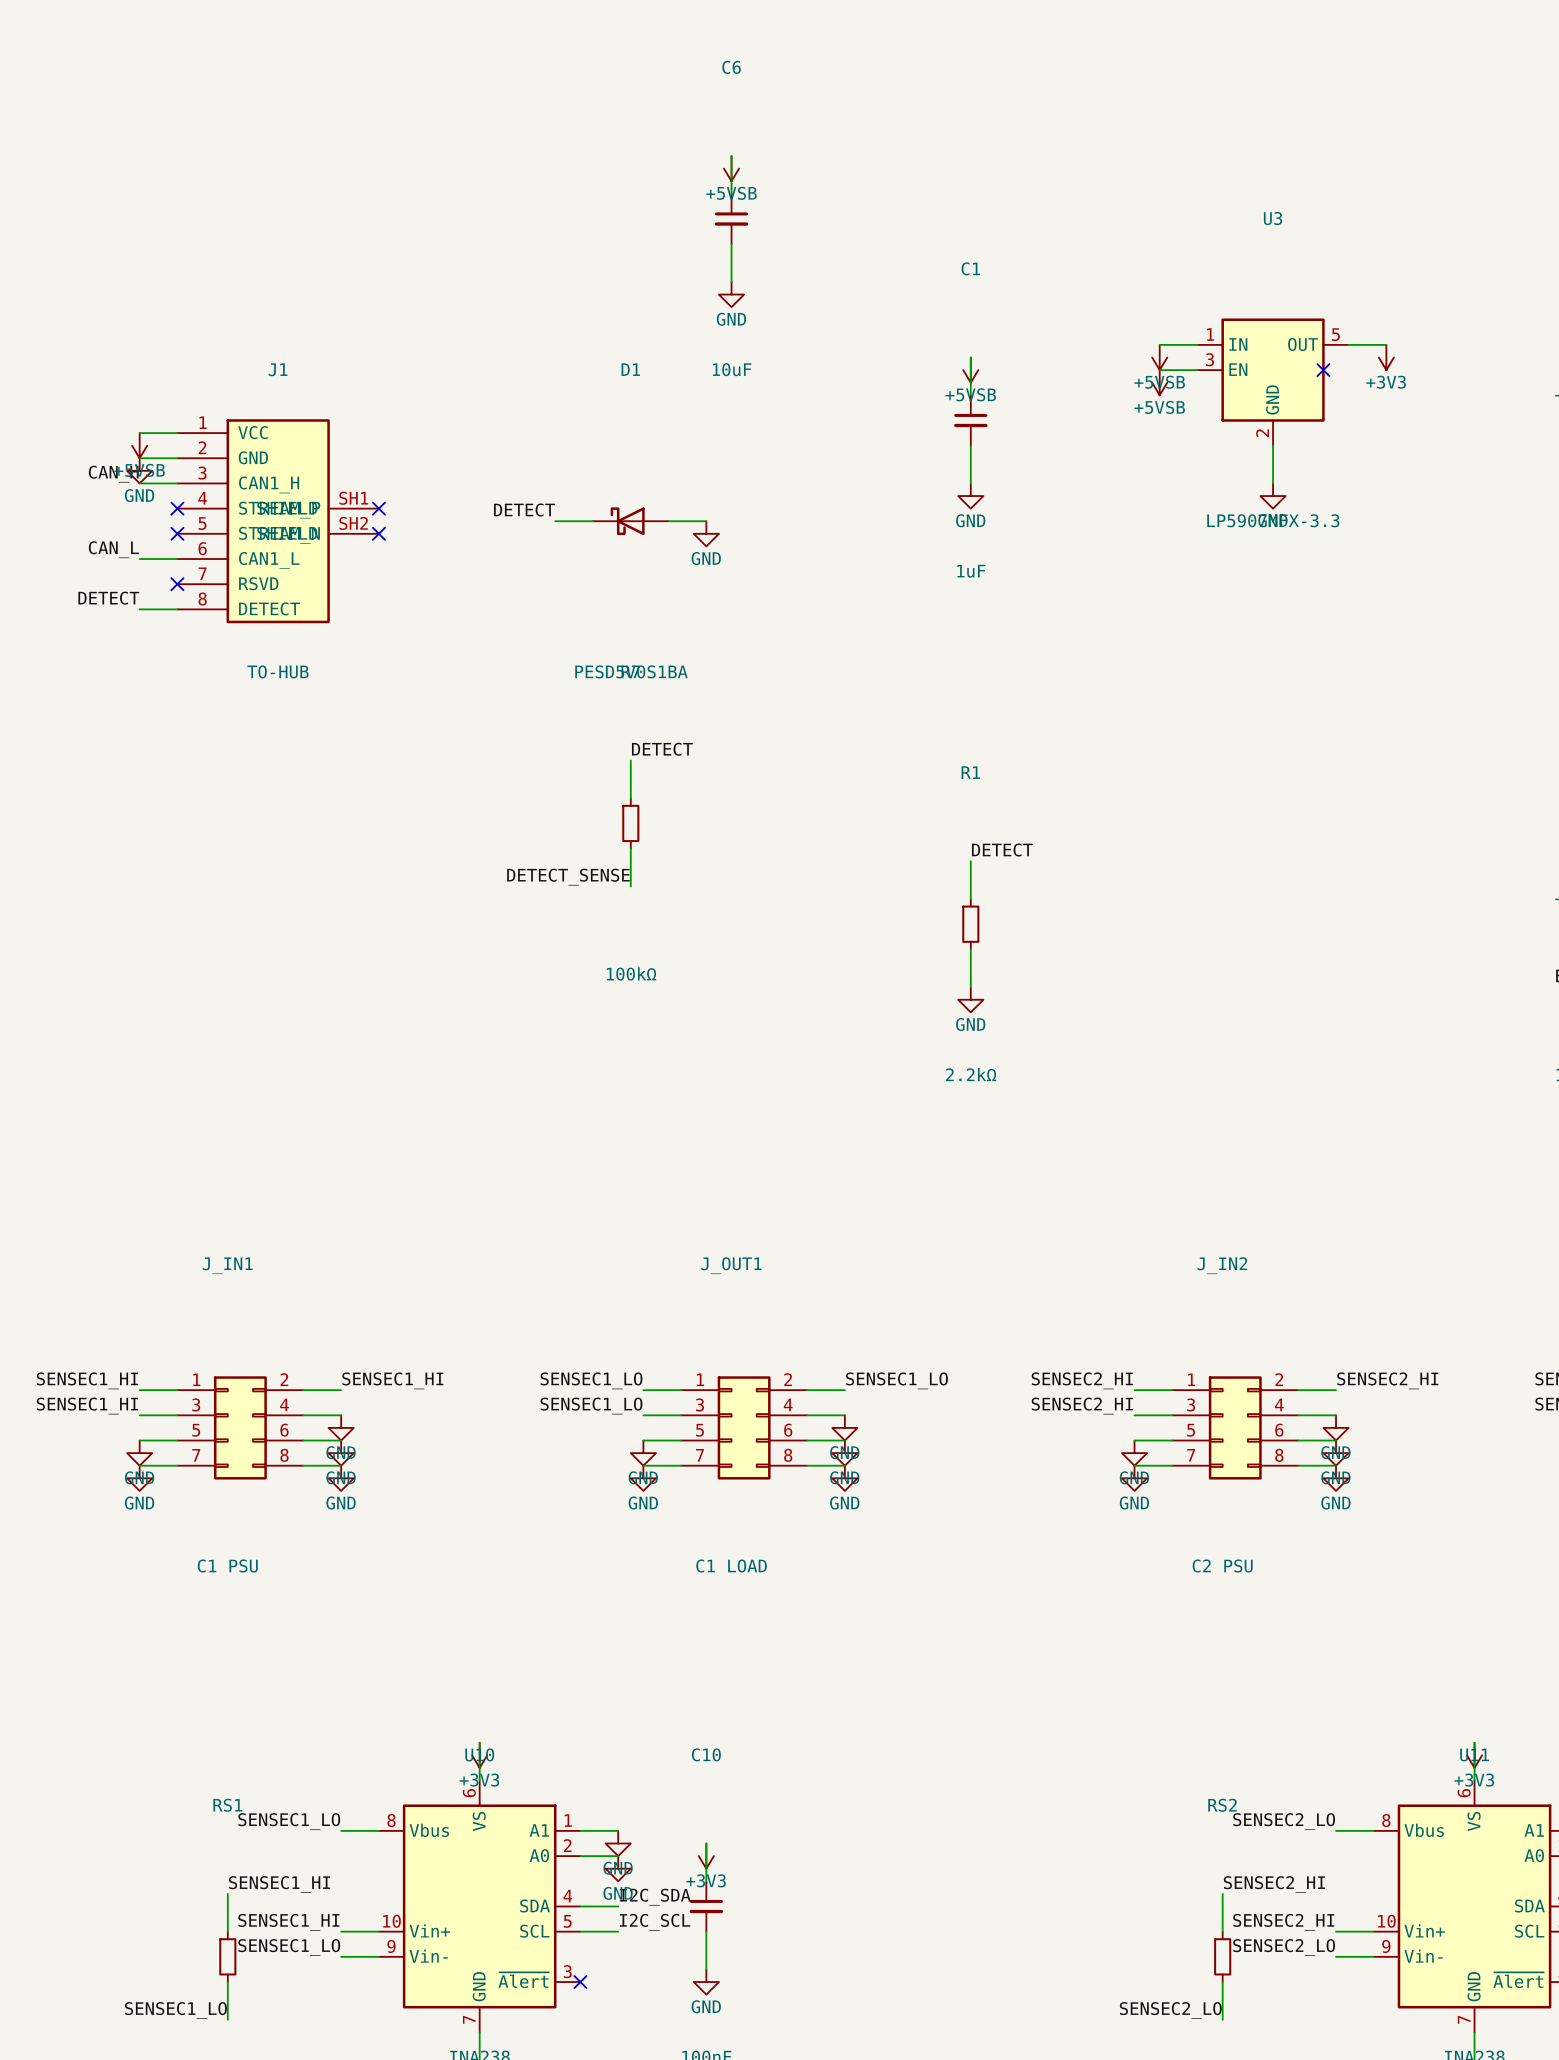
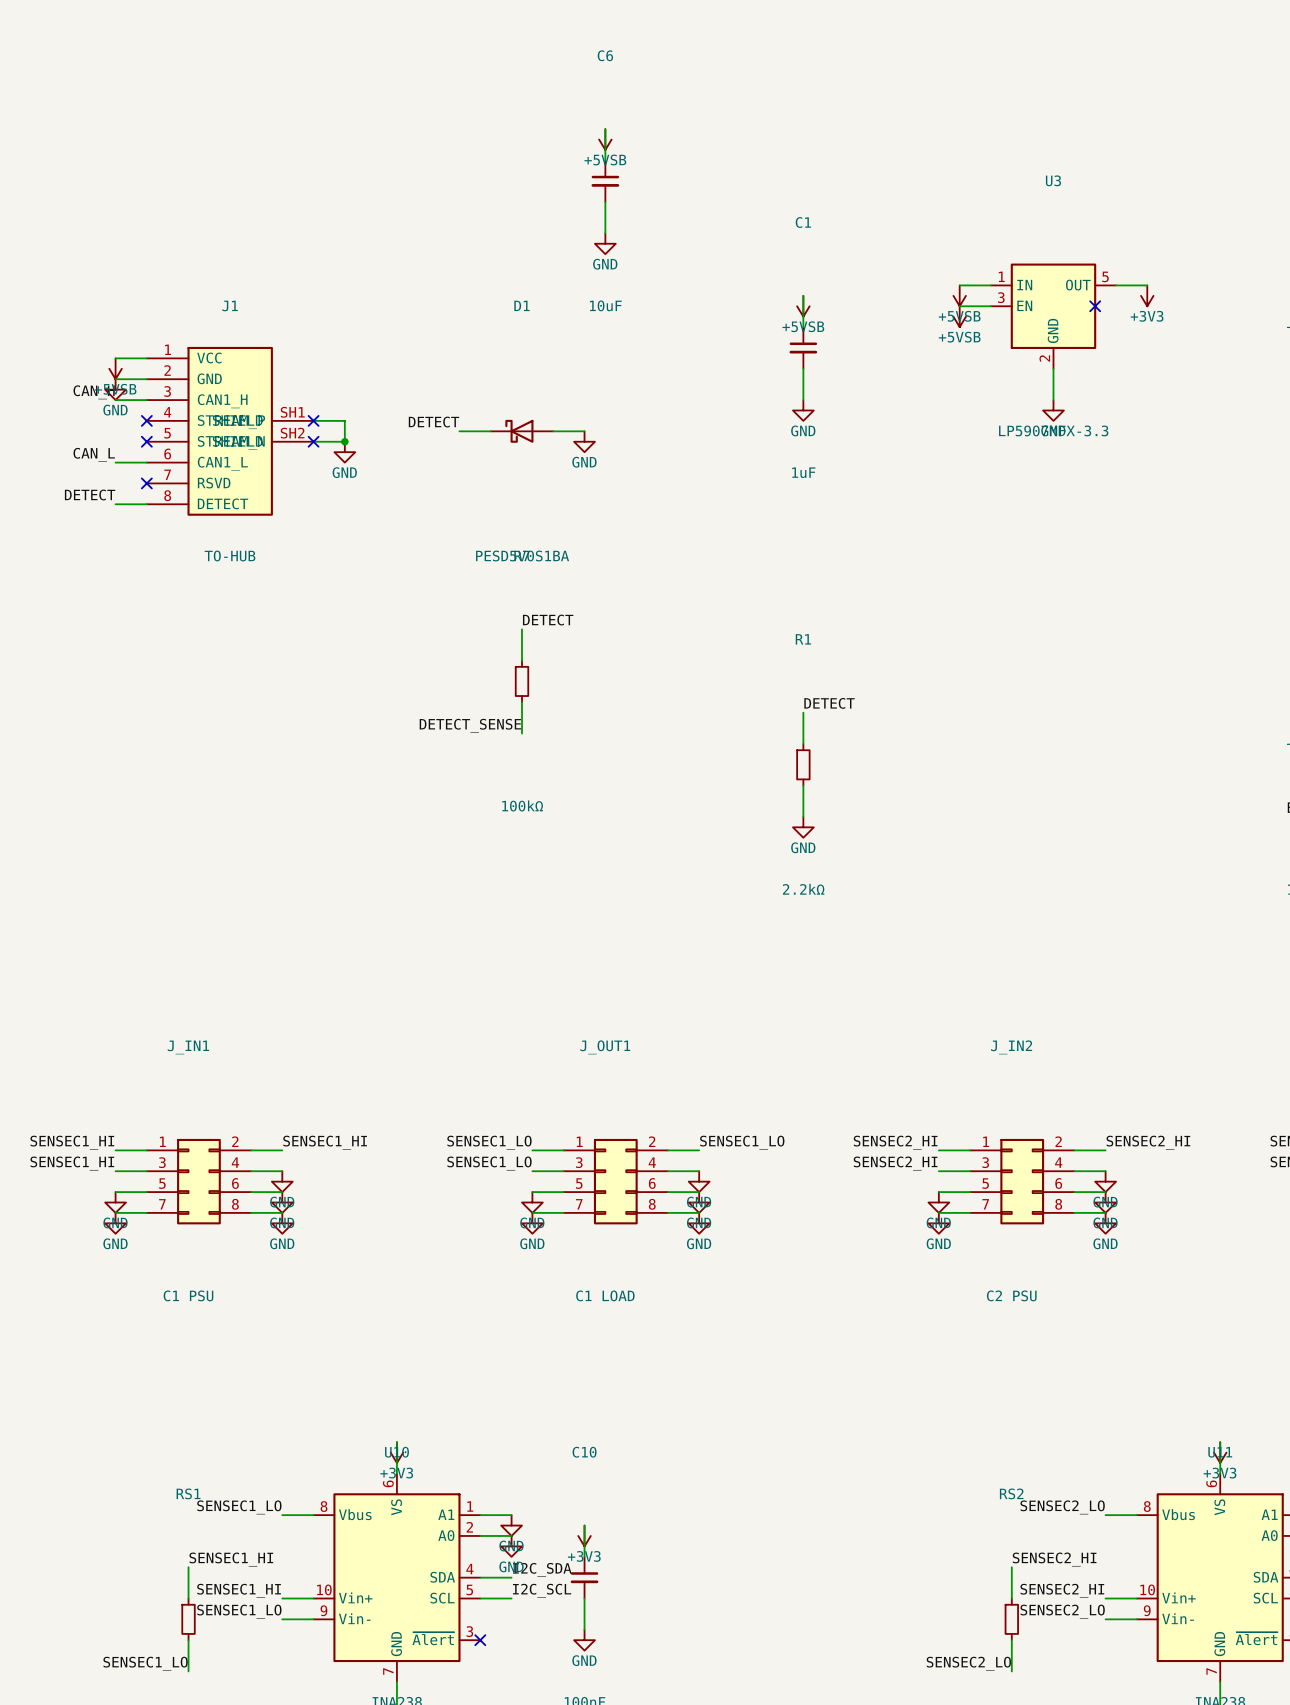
wire: none -> (313, 420) (344, 420) (344, 441) (313, 441)
junction: none -> (344, 441)
power symbol: none -> GND (344, 452)

